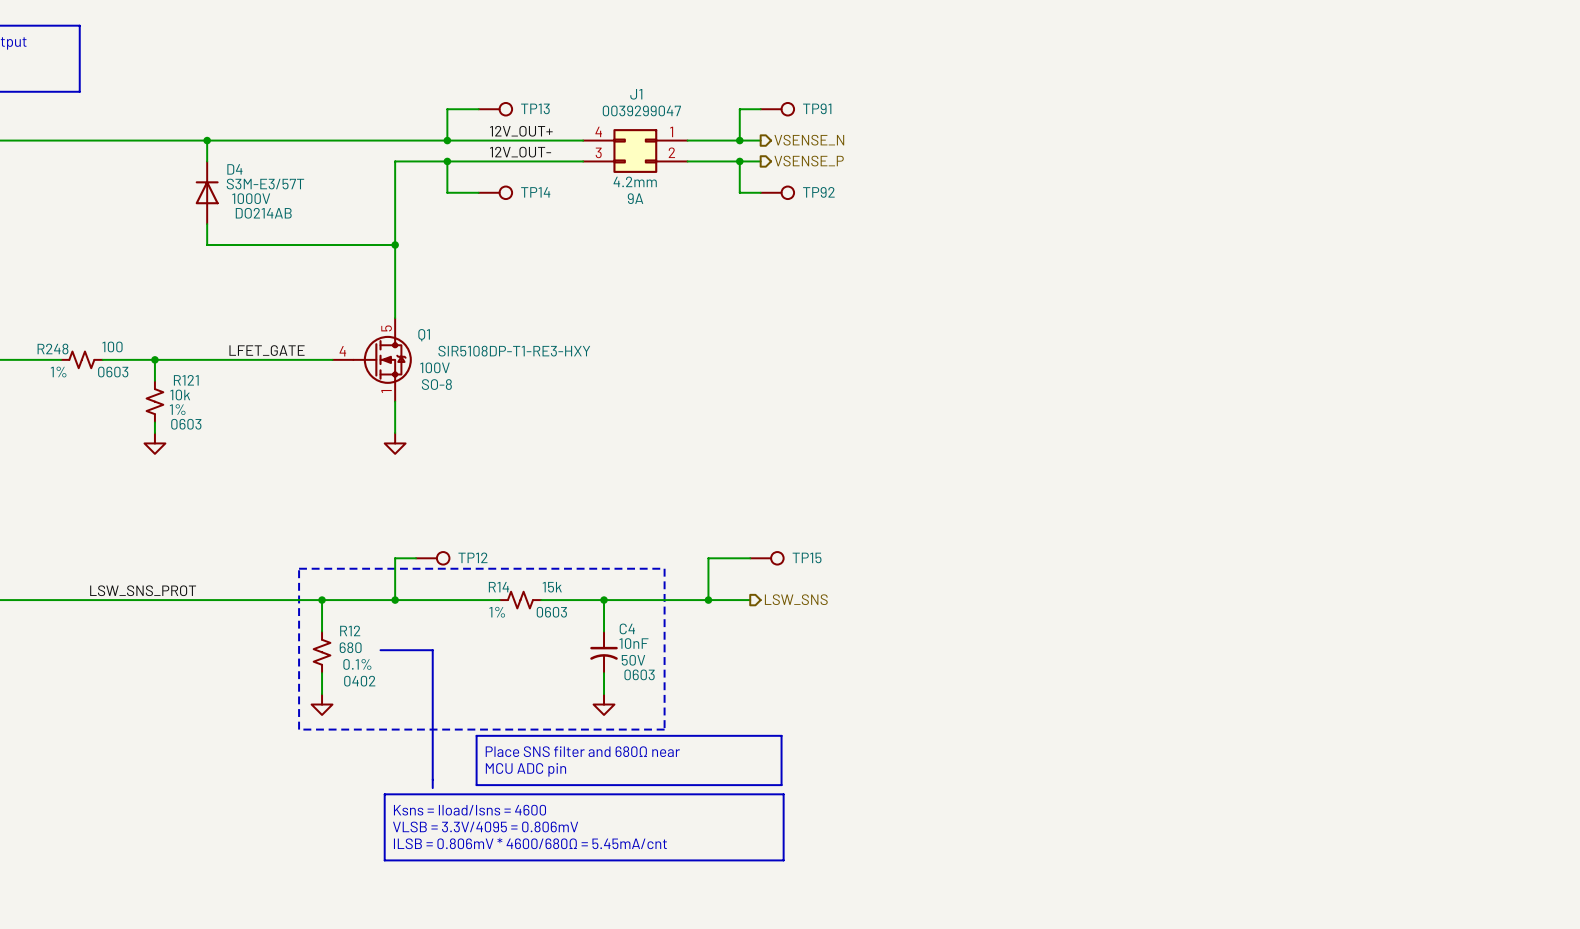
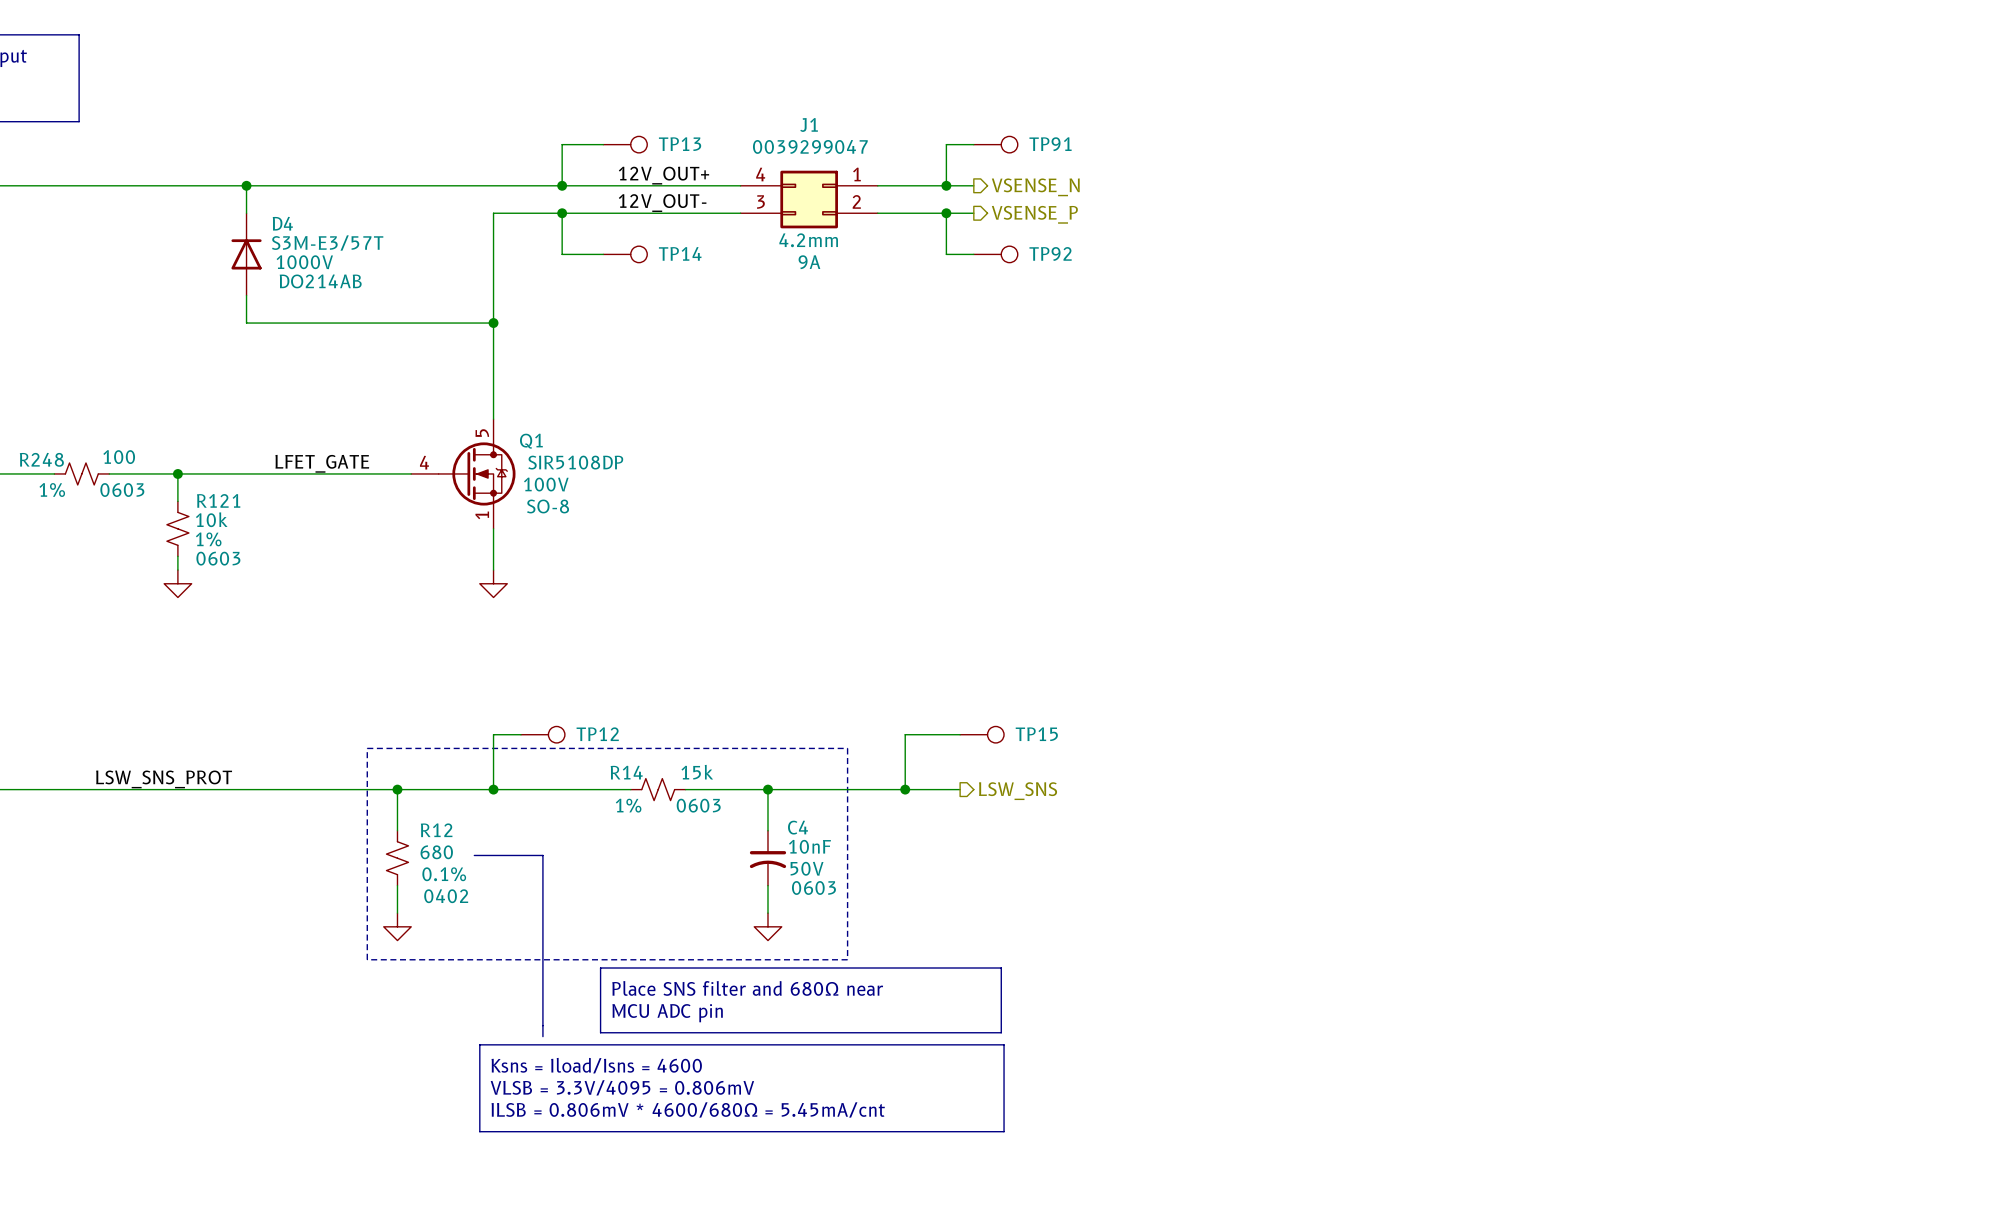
Q1 value: SIR5108DP-T1-RE3-HXY (514, 351) -> SIR5108DP (575, 462)

